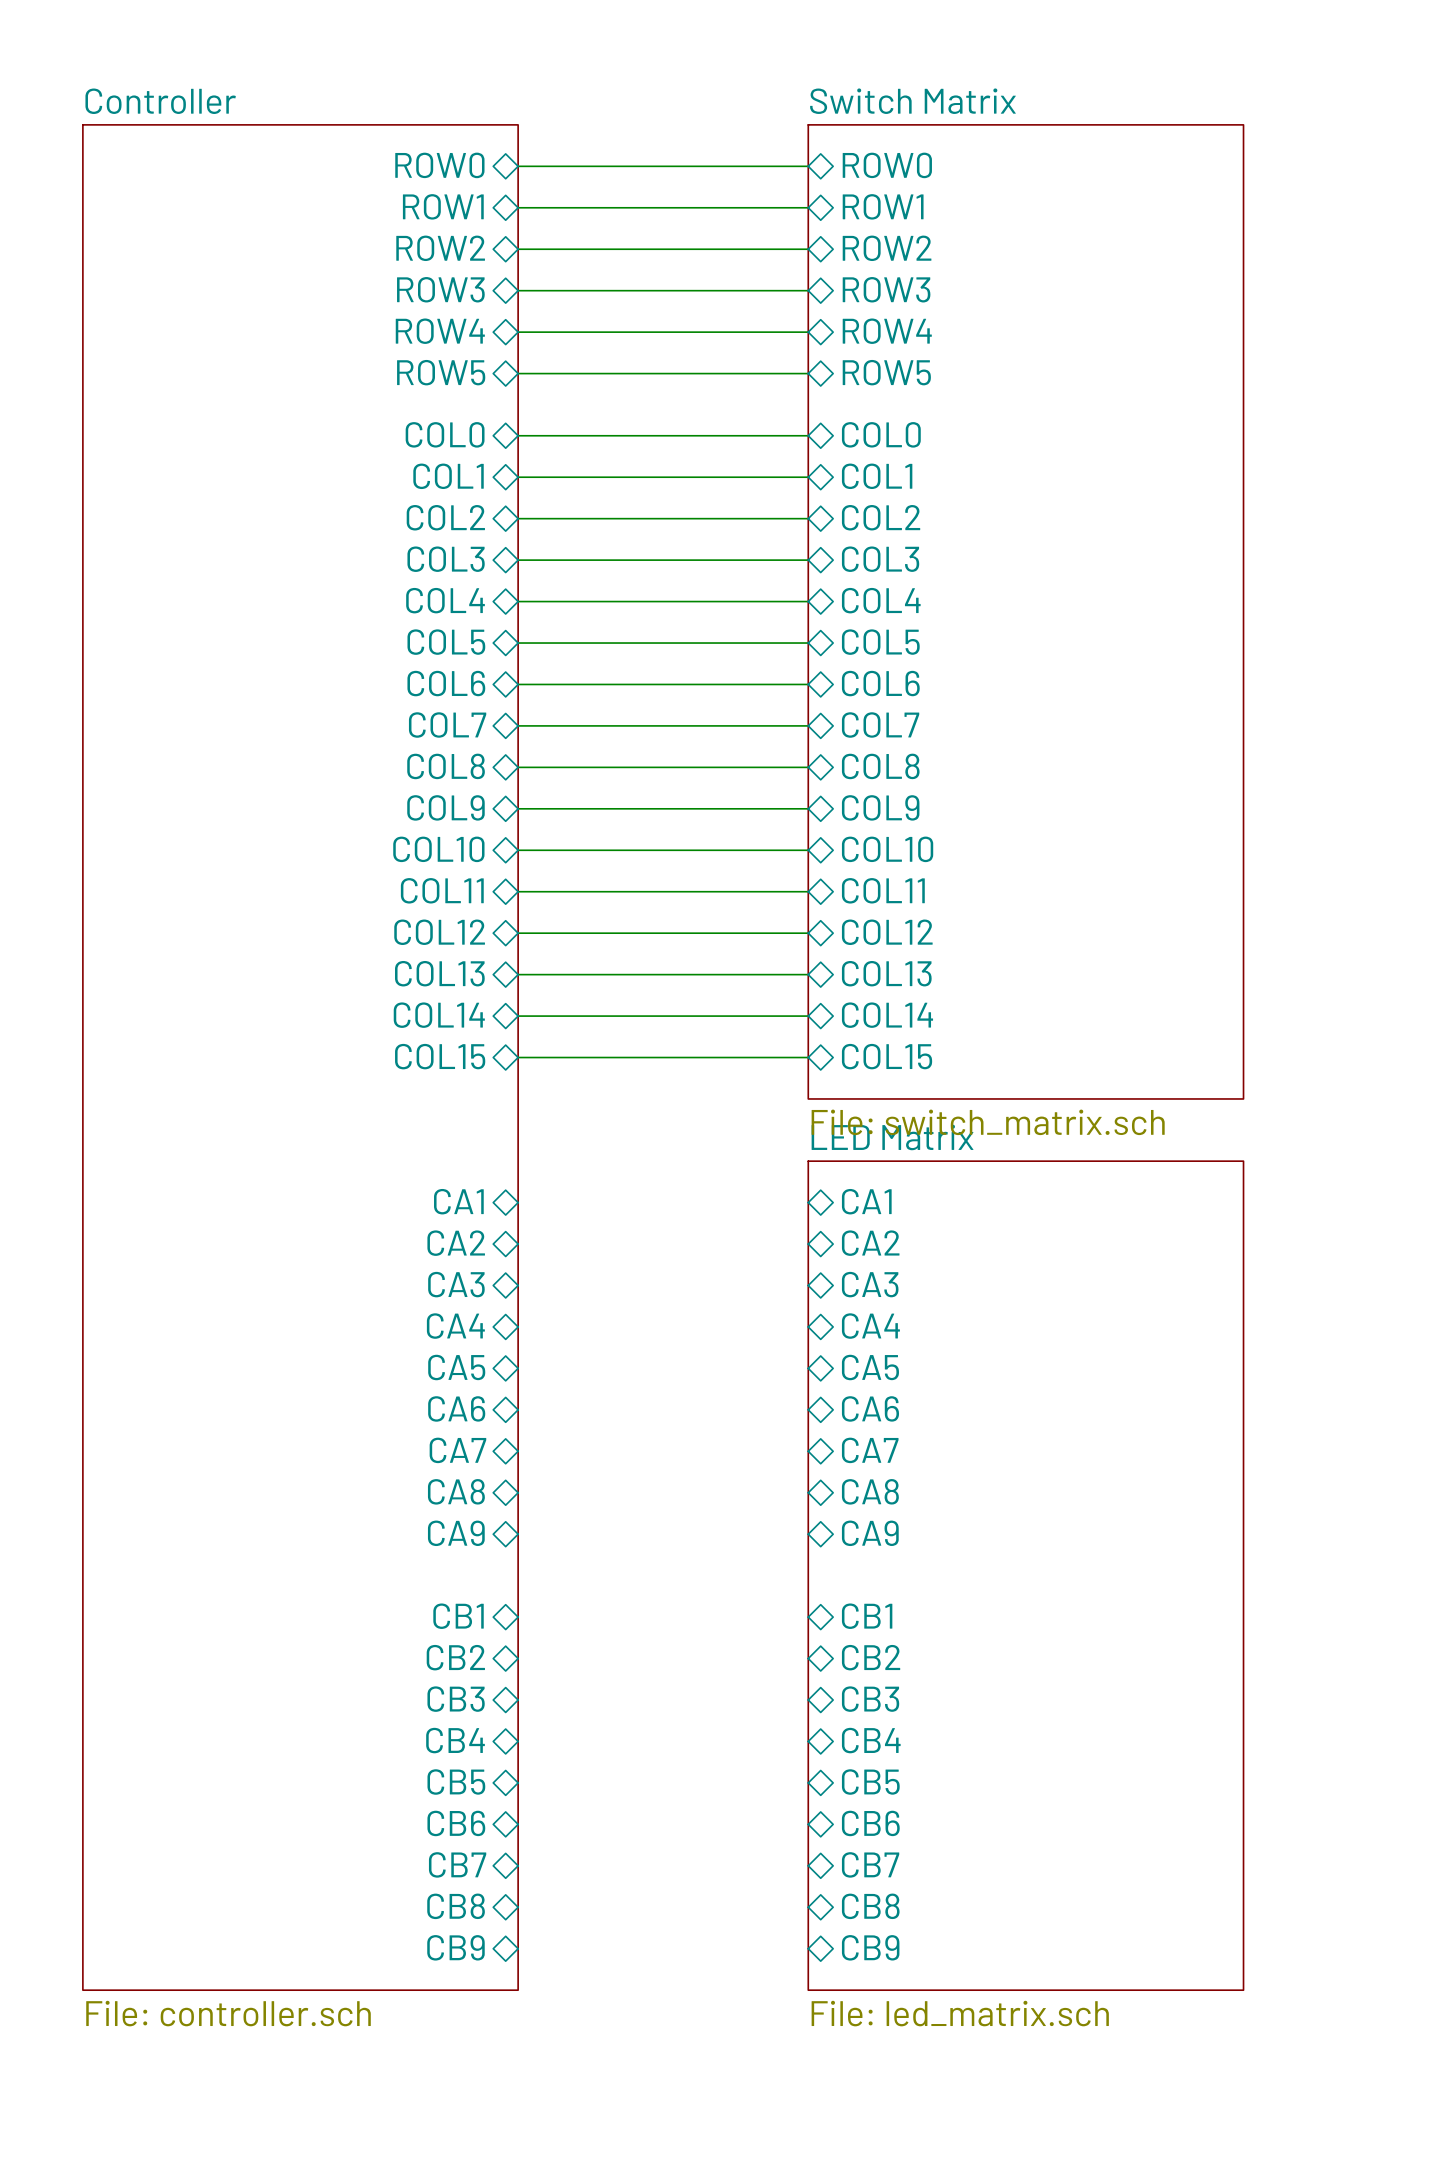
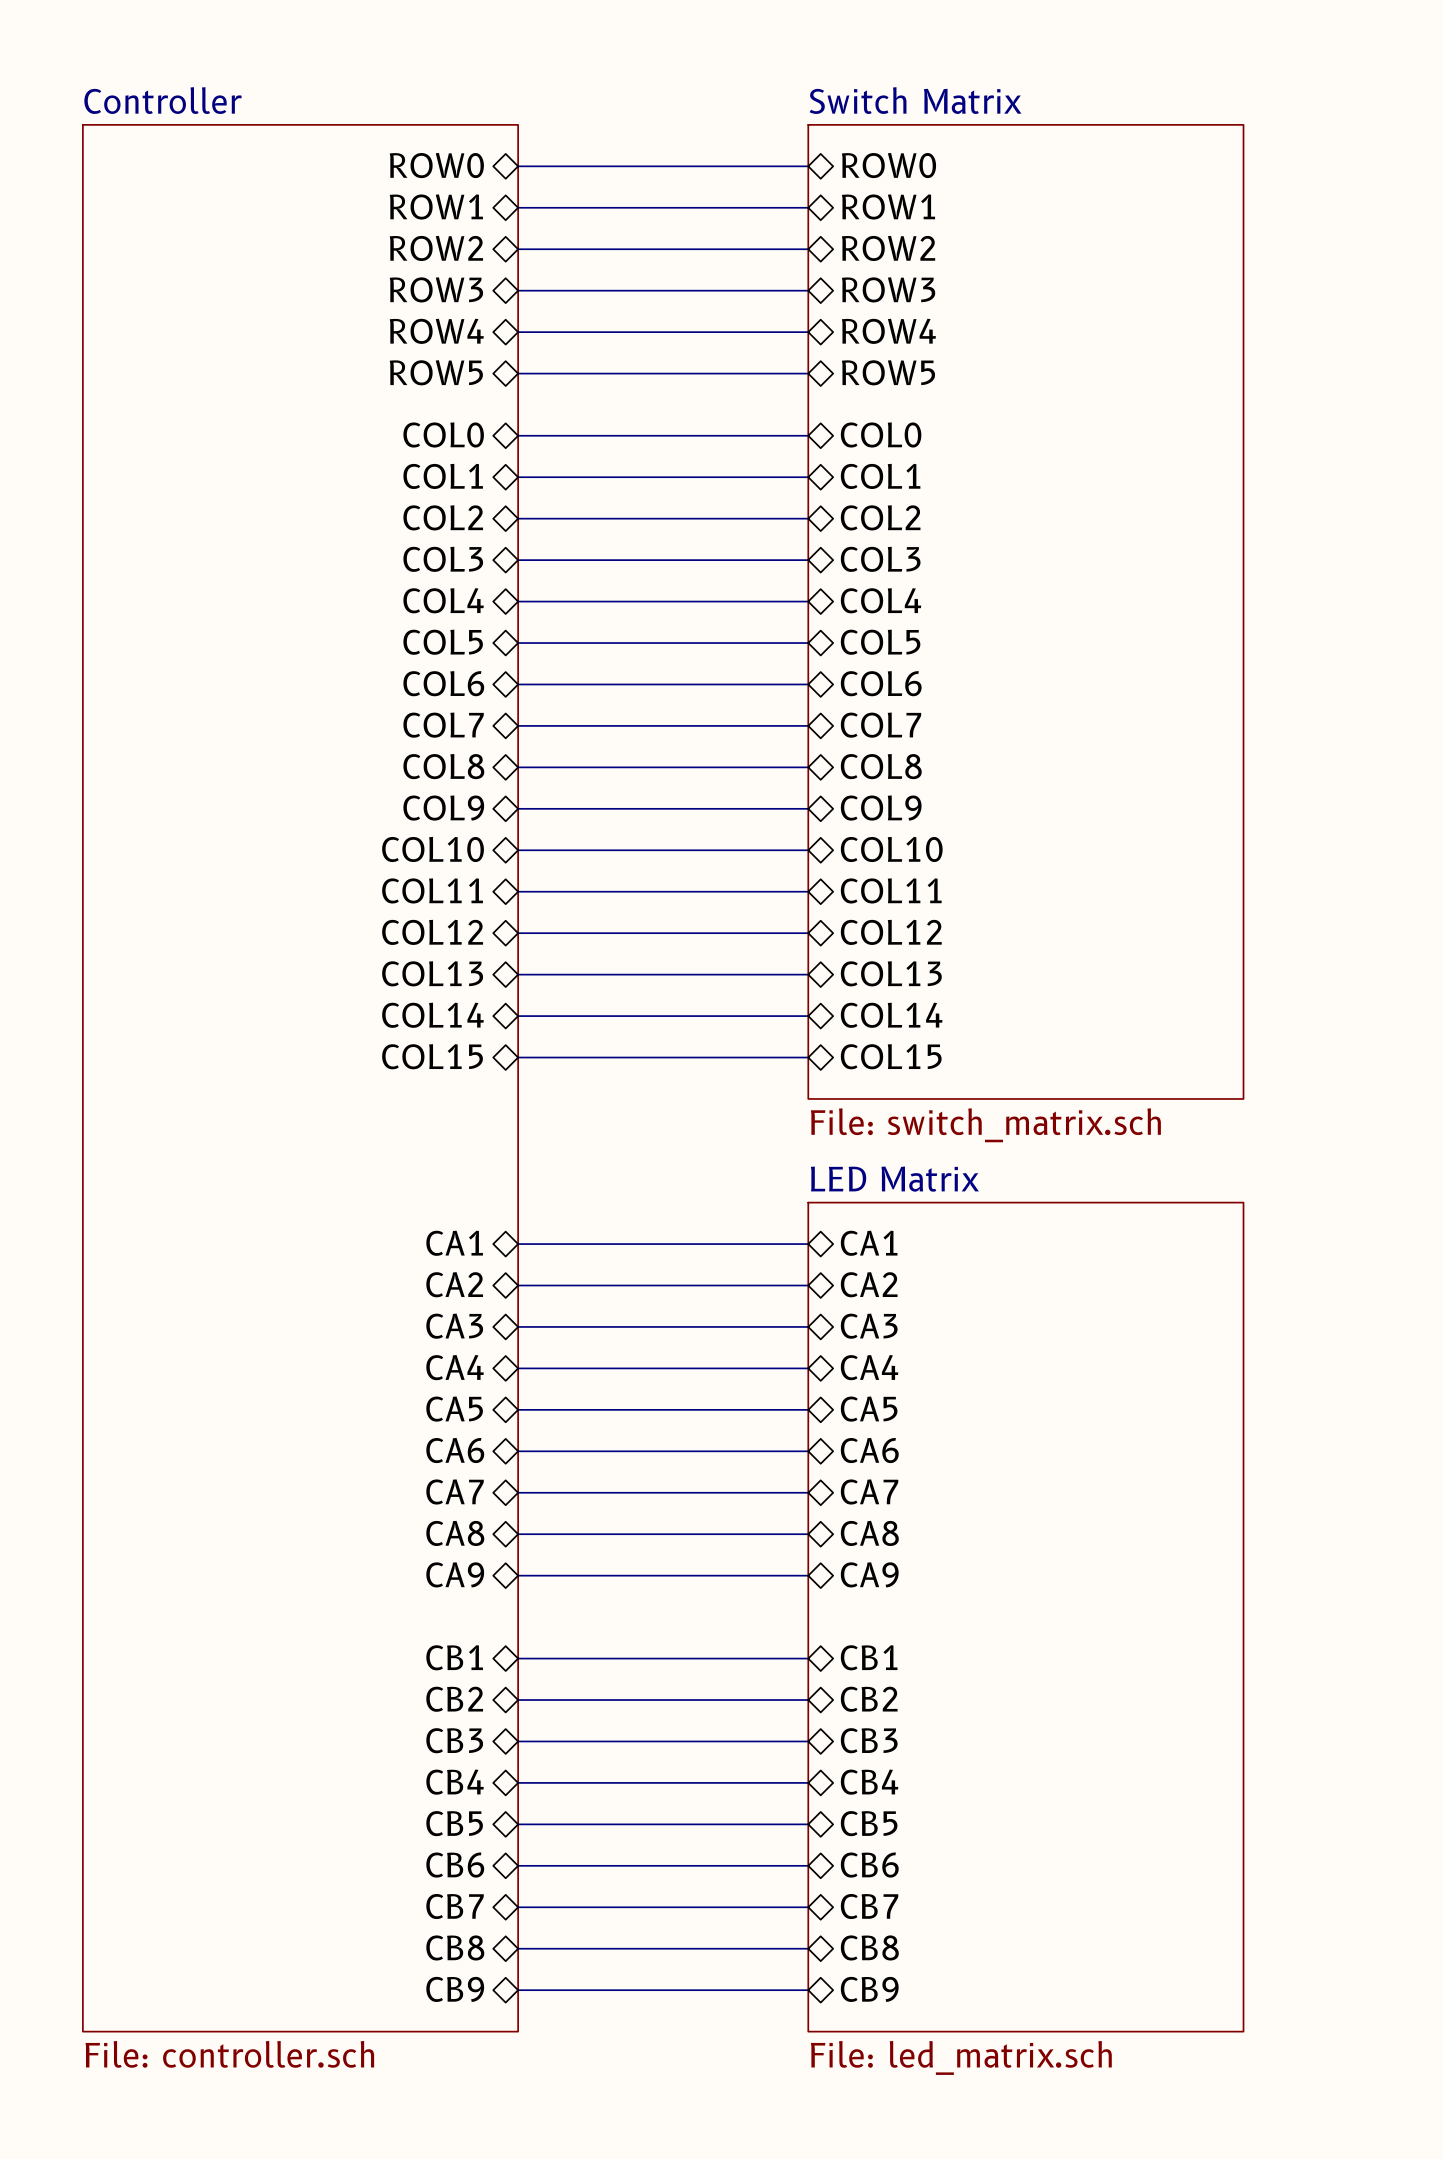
sheet Controller: File: controller.sch (300, 1057) -> none
sheet Controller: none -> File: controller.sch (300, 1078)
sheet pin: CA1 (458, 1201) -> none
sheet pin: CA1 (866, 1201) -> none
sheet pin: CA2 (456, 1243) -> CA1 (454, 1243)
sheet pin: CA2 (870, 1243) -> CA1 (869, 1243)
wire: none -> (518, 1244) (808, 1244)
sheet pin: CA3 (456, 1284) -> CA2 (454, 1284)
sheet pin: CA3 (870, 1284) -> CA2 (869, 1284)
wire: none -> (518, 1285) (808, 1285)
sheet pin: CA4 (455, 1326) -> CA3 (454, 1326)
wire: none -> (518, 1326) (808, 1326)
sheet pin: CA4 (870, 1326) -> CA3 (869, 1326)
sheet pin: CA5 (456, 1367) -> CA4 (455, 1367)
sheet pin: CA5 (870, 1367) -> CA4 (869, 1367)
wire: none -> (518, 1368) (808, 1368)
sheet pin: CA6 (456, 1408) -> CA5 (454, 1409)
sheet pin: CA6 (870, 1408) -> CA5 (869, 1409)
wire: none -> (518, 1409) (808, 1409)
sheet pin: CA7 (457, 1450) -> CA6 (455, 1450)
sheet pin: CA7 (870, 1450) -> CA6 (869, 1450)
wire: none -> (518, 1451) (808, 1451)
sheet pin: CA8 (456, 1491) -> CA7 (455, 1491)
sheet pin: CA8 (870, 1491) -> CA7 (869, 1491)
wire: none -> (518, 1492) (808, 1492)
sheet pin: CA9 (456, 1533) -> CA8 (455, 1533)
sheet pin: CA9 (870, 1533) -> CA8 (869, 1533)
wire: none -> (518, 1534) (808, 1534)
sheet pin: none -> CA9 (455, 1574)
sheet pin: none -> CA9 (869, 1574)
wire: none -> (518, 1575) (808, 1575)
sheet LED Matrix position: (1025, 1575) -> (1025, 1617)
sheet pin: CB1 (458, 1616) -> none
sheet pin: CB1 (867, 1616) -> none
sheet pin: CB2 (455, 1657) -> CB1 (454, 1657)
sheet pin: CB2 (871, 1657) -> CB1 (869, 1657)
wire: none -> (518, 1658) (808, 1658)
sheet pin: CB3 (456, 1699) -> CB2 (454, 1699)
sheet pin: CB3 (870, 1699) -> CB2 (869, 1699)
wire: none -> (518, 1700) (808, 1700)
sheet pin: CB4 (455, 1740) -> CB3 (454, 1740)
sheet pin: CB4 (871, 1740) -> CB3 (869, 1740)
wire: none -> (518, 1741) (808, 1741)
sheet pin: CB5 (456, 1782) -> CB4 (455, 1782)
wire: none -> (518, 1782) (808, 1782)
sheet pin: CB5 (870, 1782) -> CB4 (869, 1782)
sheet pin: CB6 (456, 1823) -> CB5 (454, 1823)
sheet pin: CB6 (870, 1823) -> CB5 (869, 1823)
wire: none -> (518, 1824) (808, 1824)
sheet pin: CB7 (457, 1864) -> CB6 (455, 1865)
sheet pin: CB7 (870, 1864) -> CB6 (869, 1865)
wire: none -> (518, 1865) (808, 1865)
sheet pin: CB8 (456, 1906) -> CB7 (455, 1906)
sheet pin: CB8 (870, 1906) -> CB7 (869, 1906)
wire: none -> (518, 1907) (808, 1907)
sheet pin: CB9 (455, 1947) -> CB8 (455, 1947)
sheet pin: CB9 (870, 1947) -> CB8 (869, 1947)
wire: none -> (518, 1948) (808, 1948)
sheet pin: none -> CB9 (455, 1989)
sheet pin: none -> CB9 (869, 1989)
wire: none -> (518, 1990) (808, 1990)

